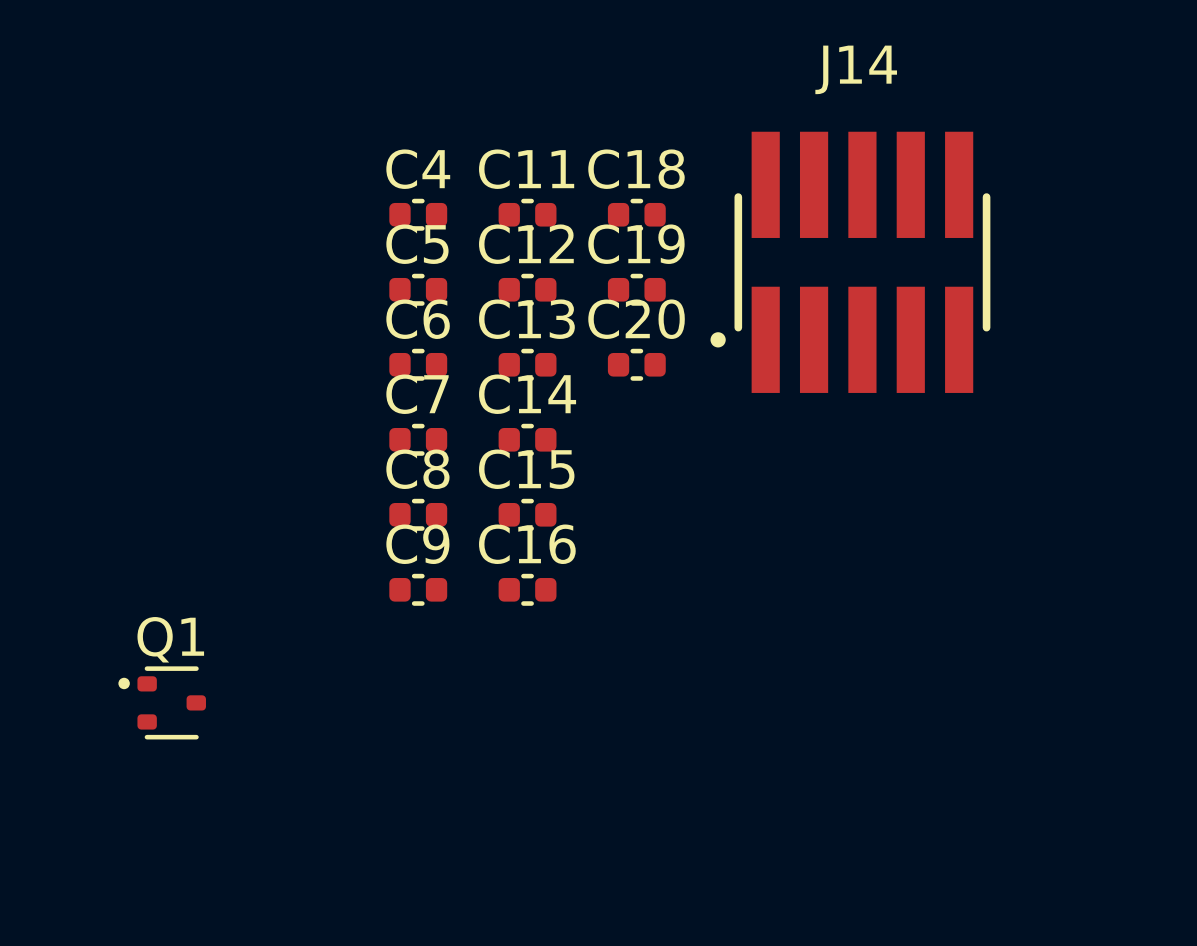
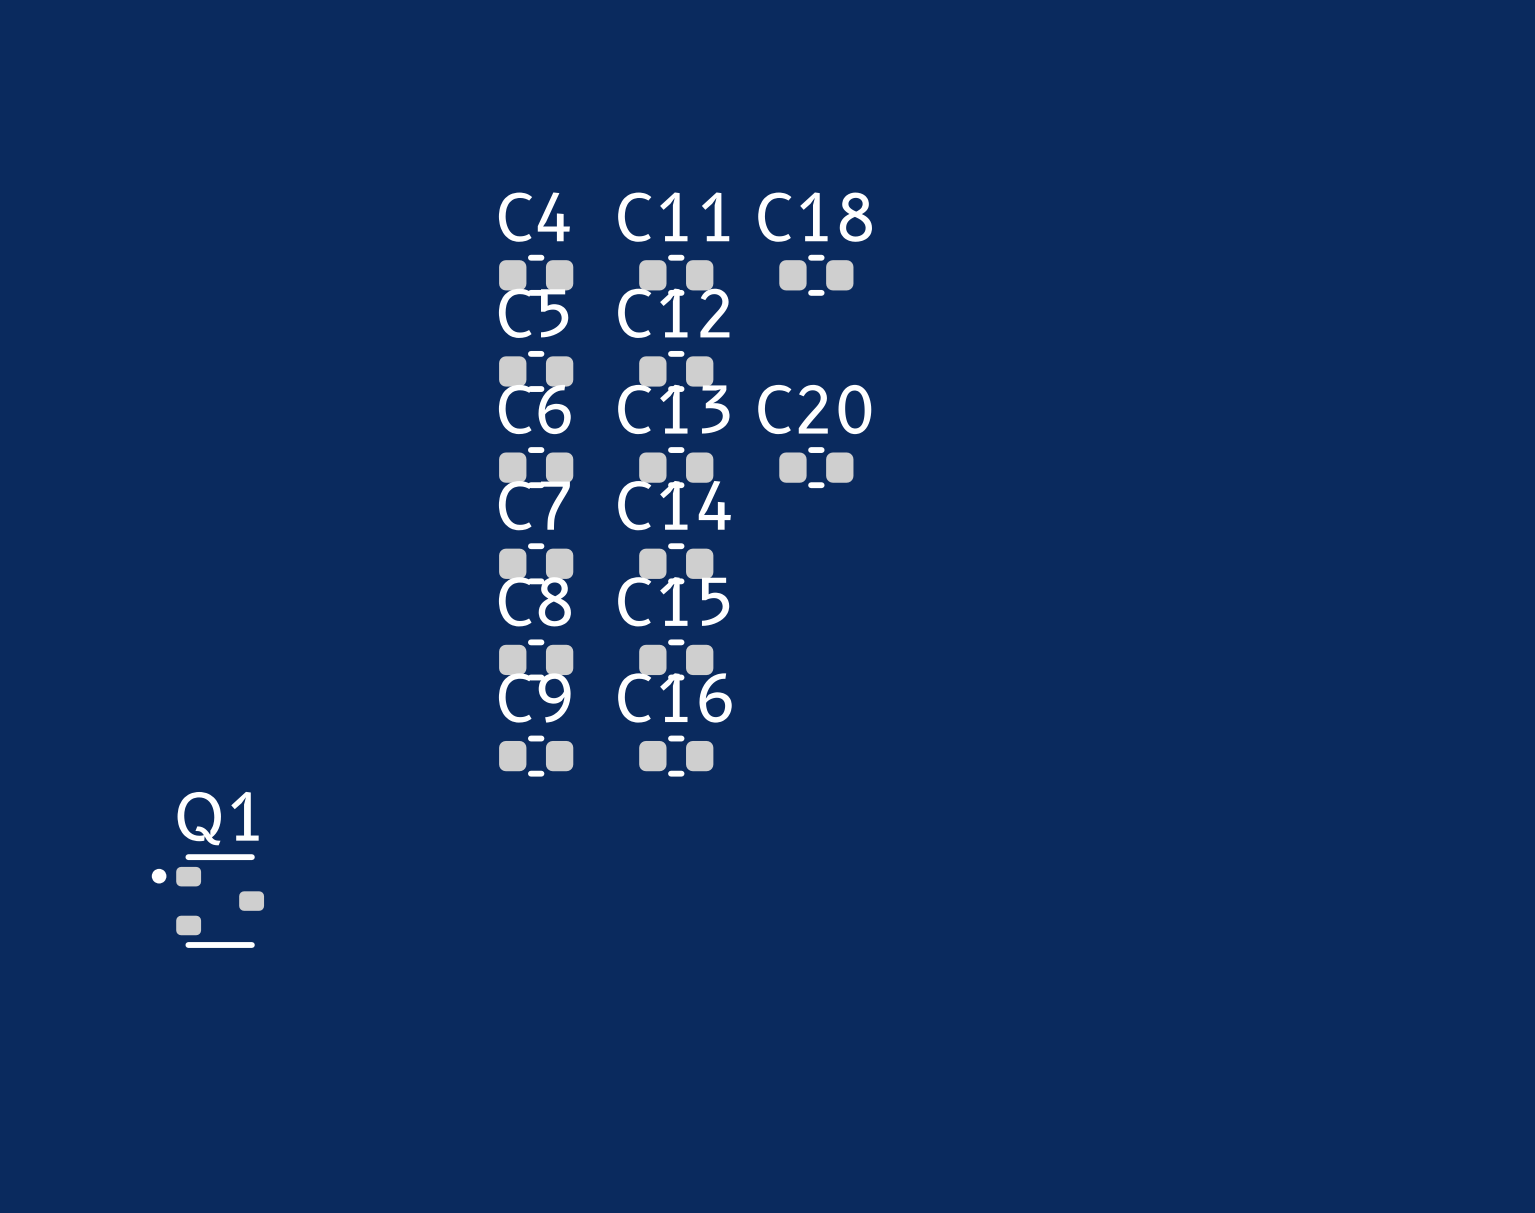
J14: (850, 262) -> none
C19: (636, 289) -> none

